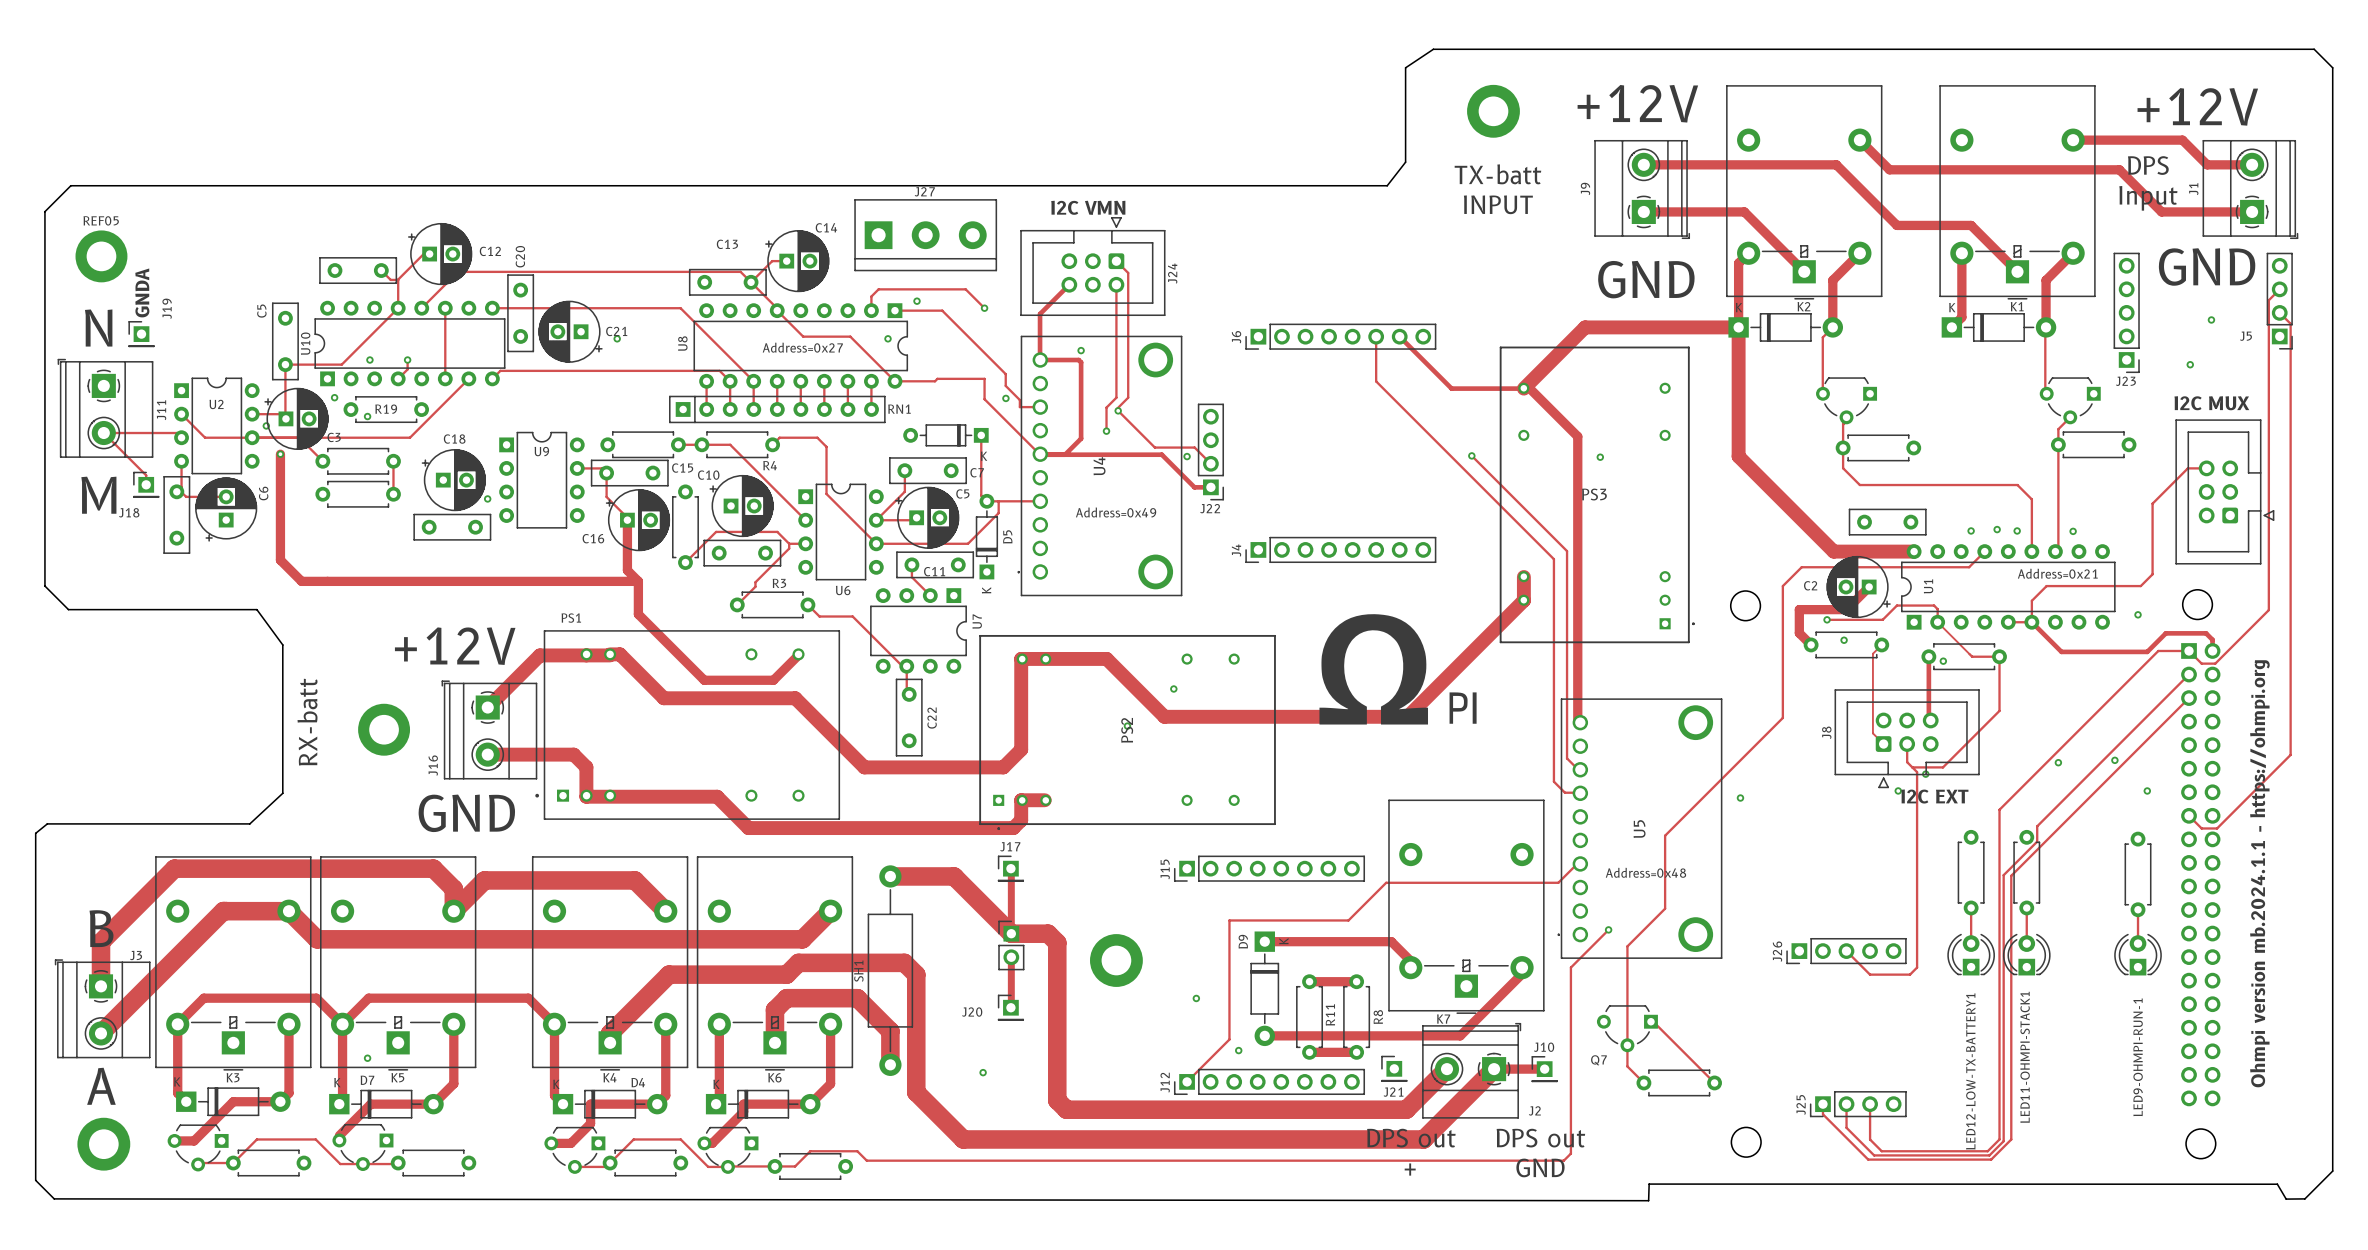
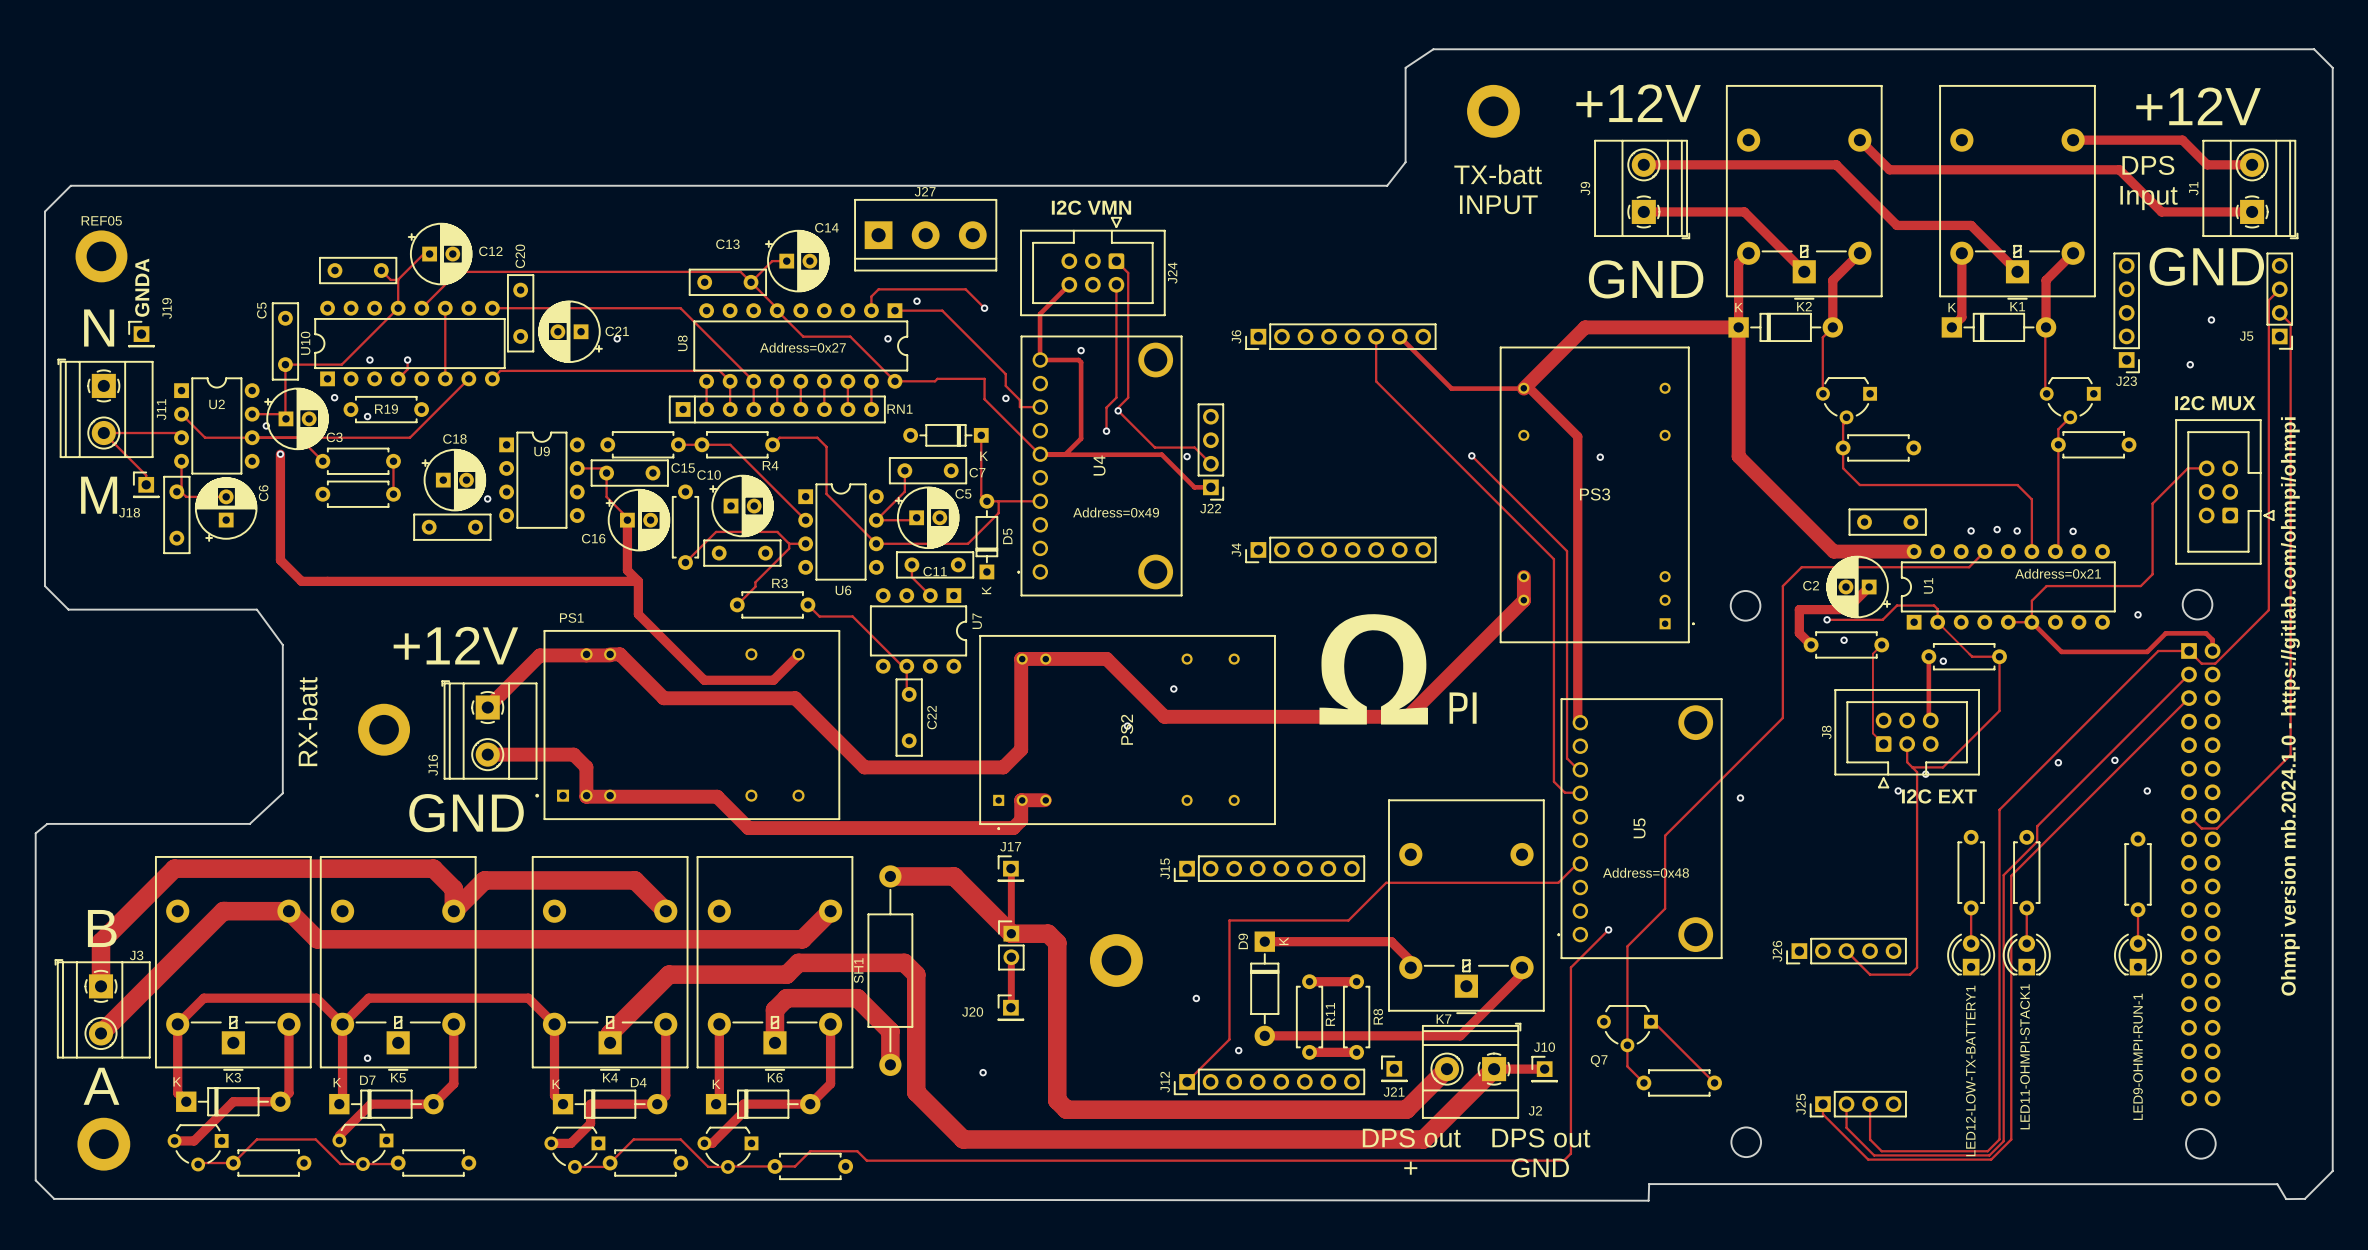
text: none -> Ohmpi version mb.2024.1.0 - https://gitlab.com/ohmpi/ohmpi (2290, 706)
text: Ohmpi version mb.2024.1.1 - https://ohmpi.org (2259, 873) -> none

